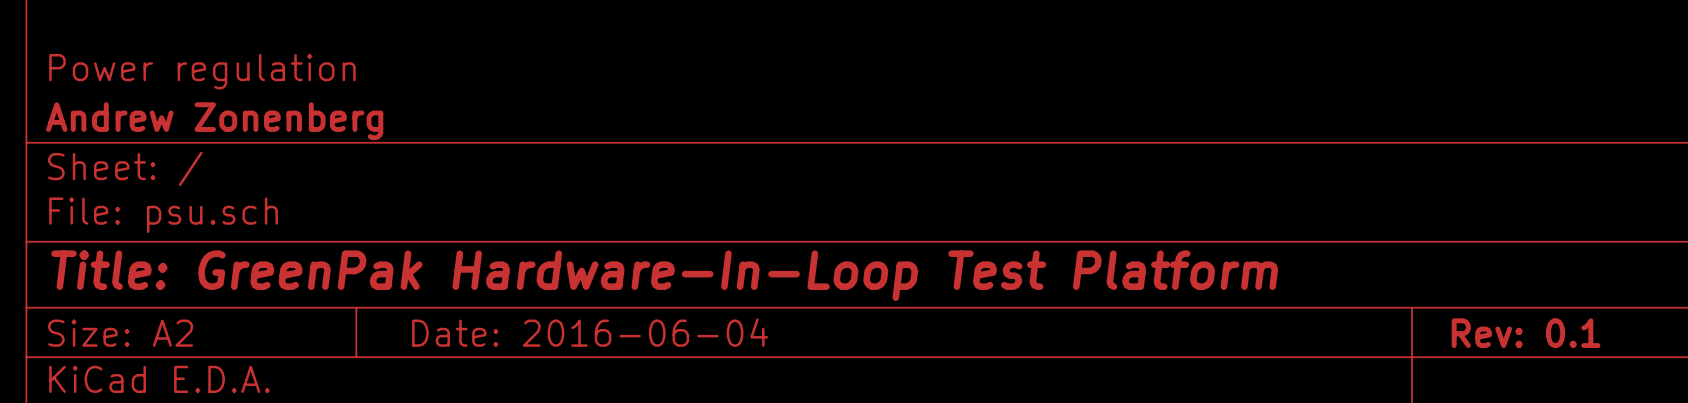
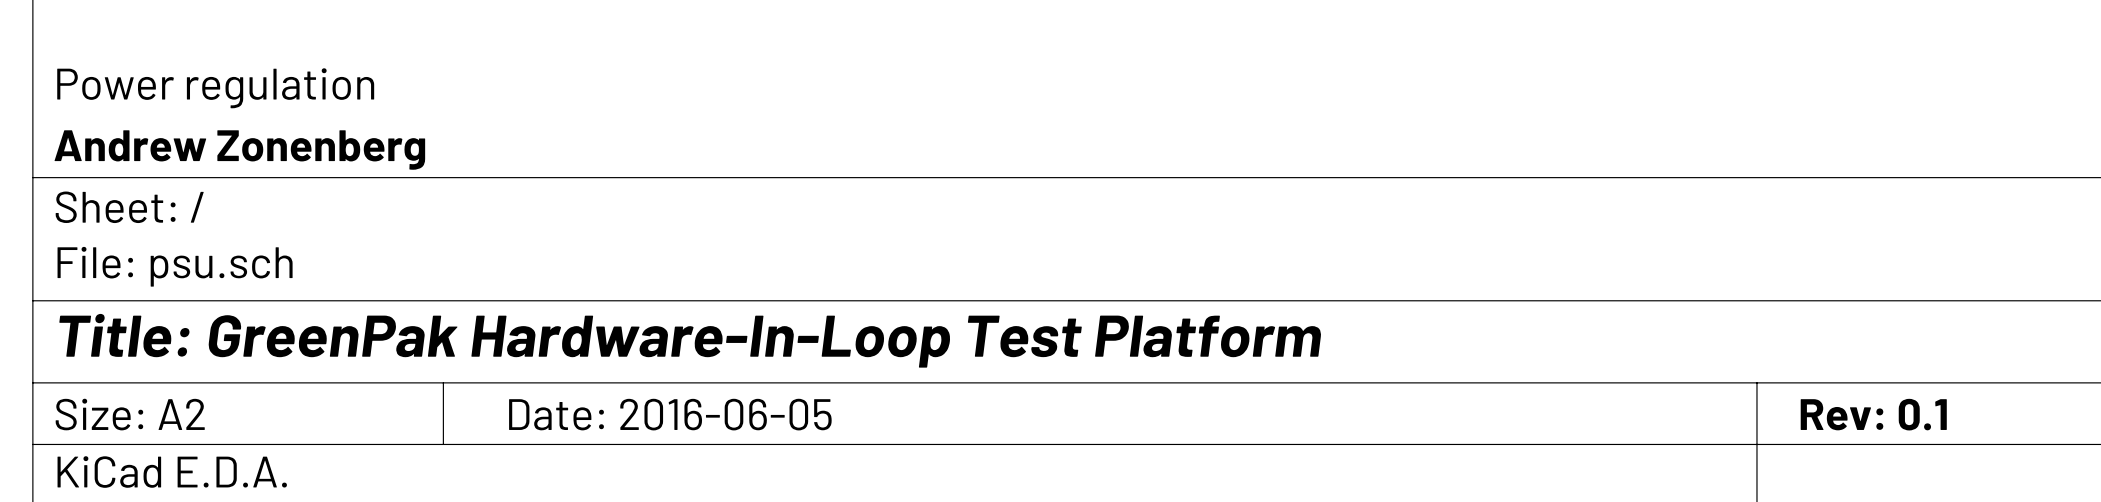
title block: Date: 2016-06-04 (590, 332) -> Date: 2016-06-05 (670, 414)

